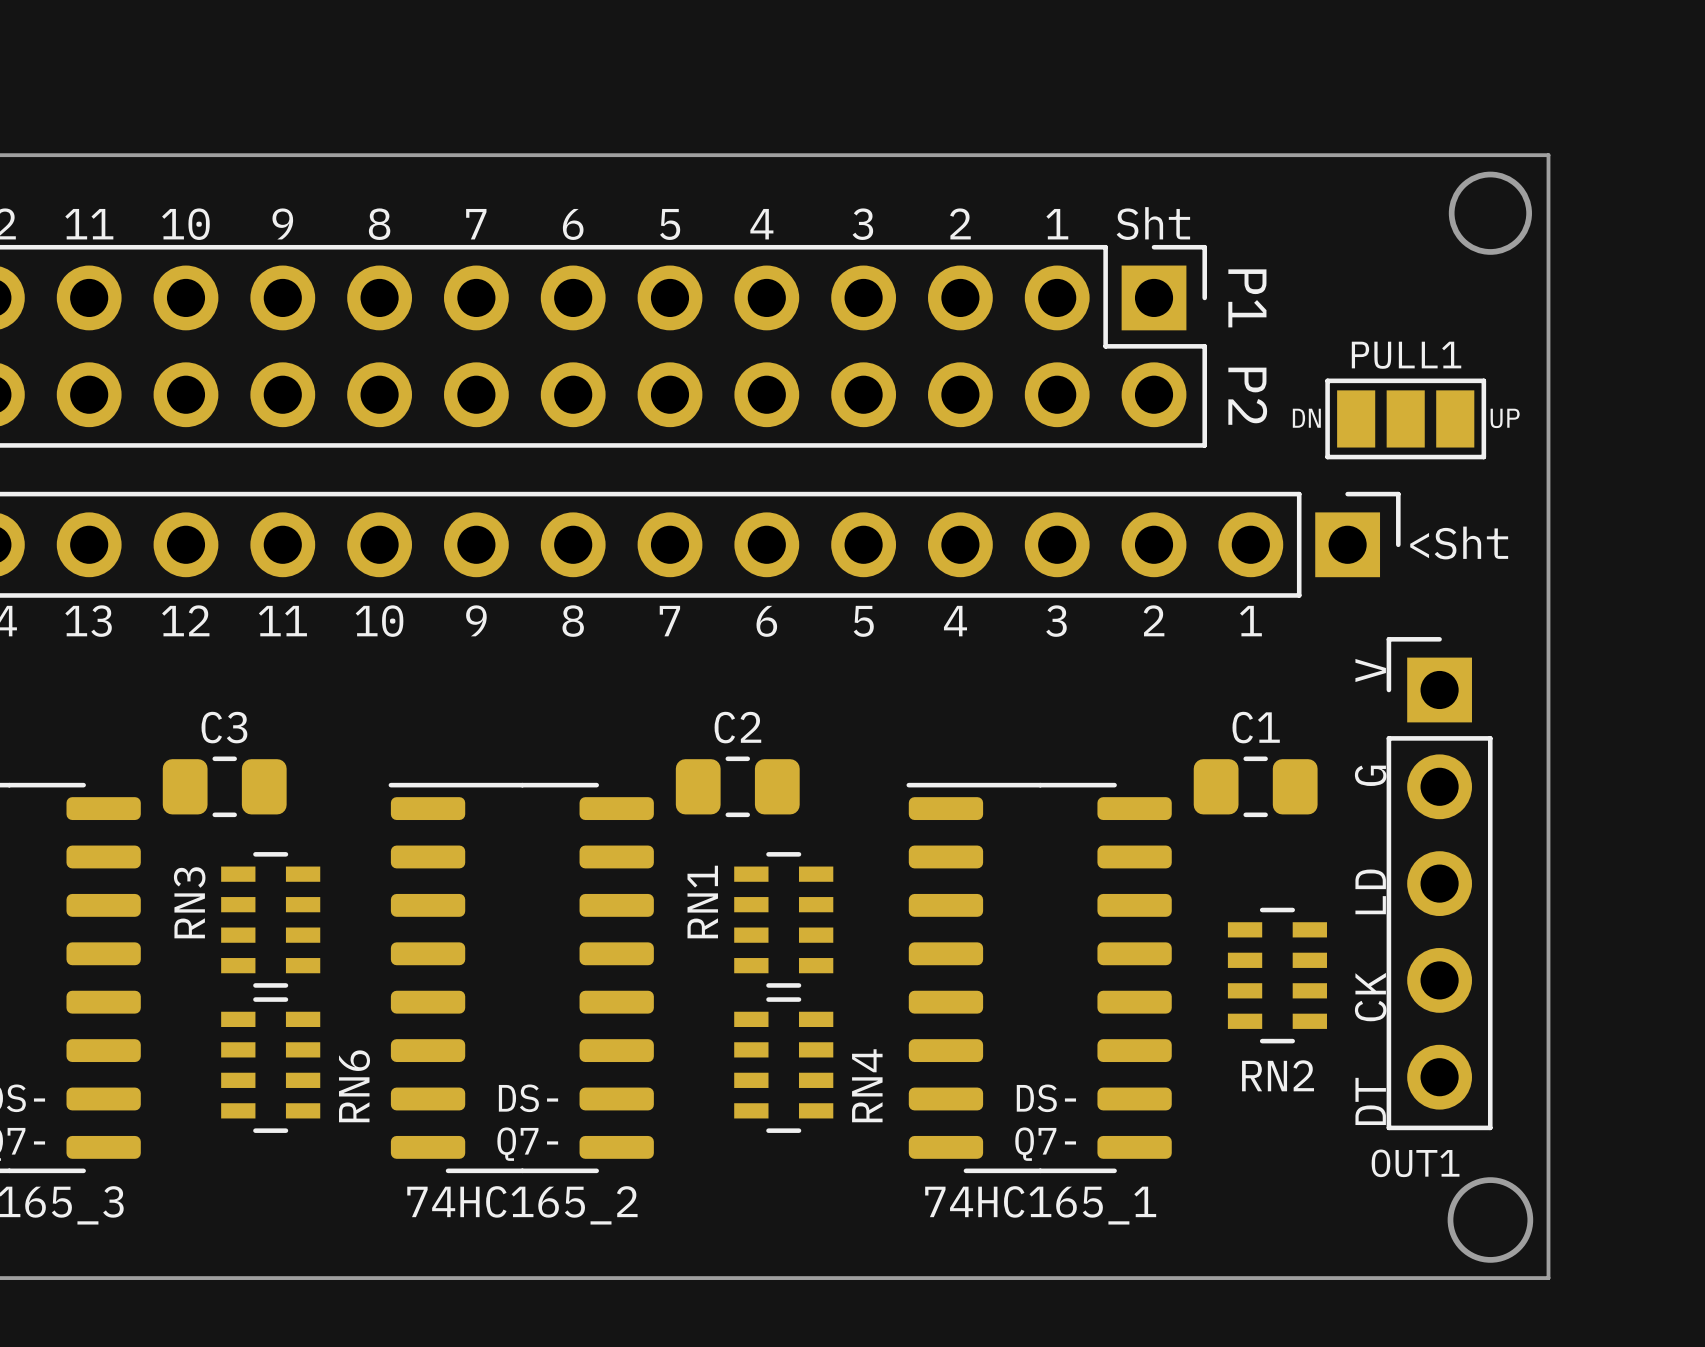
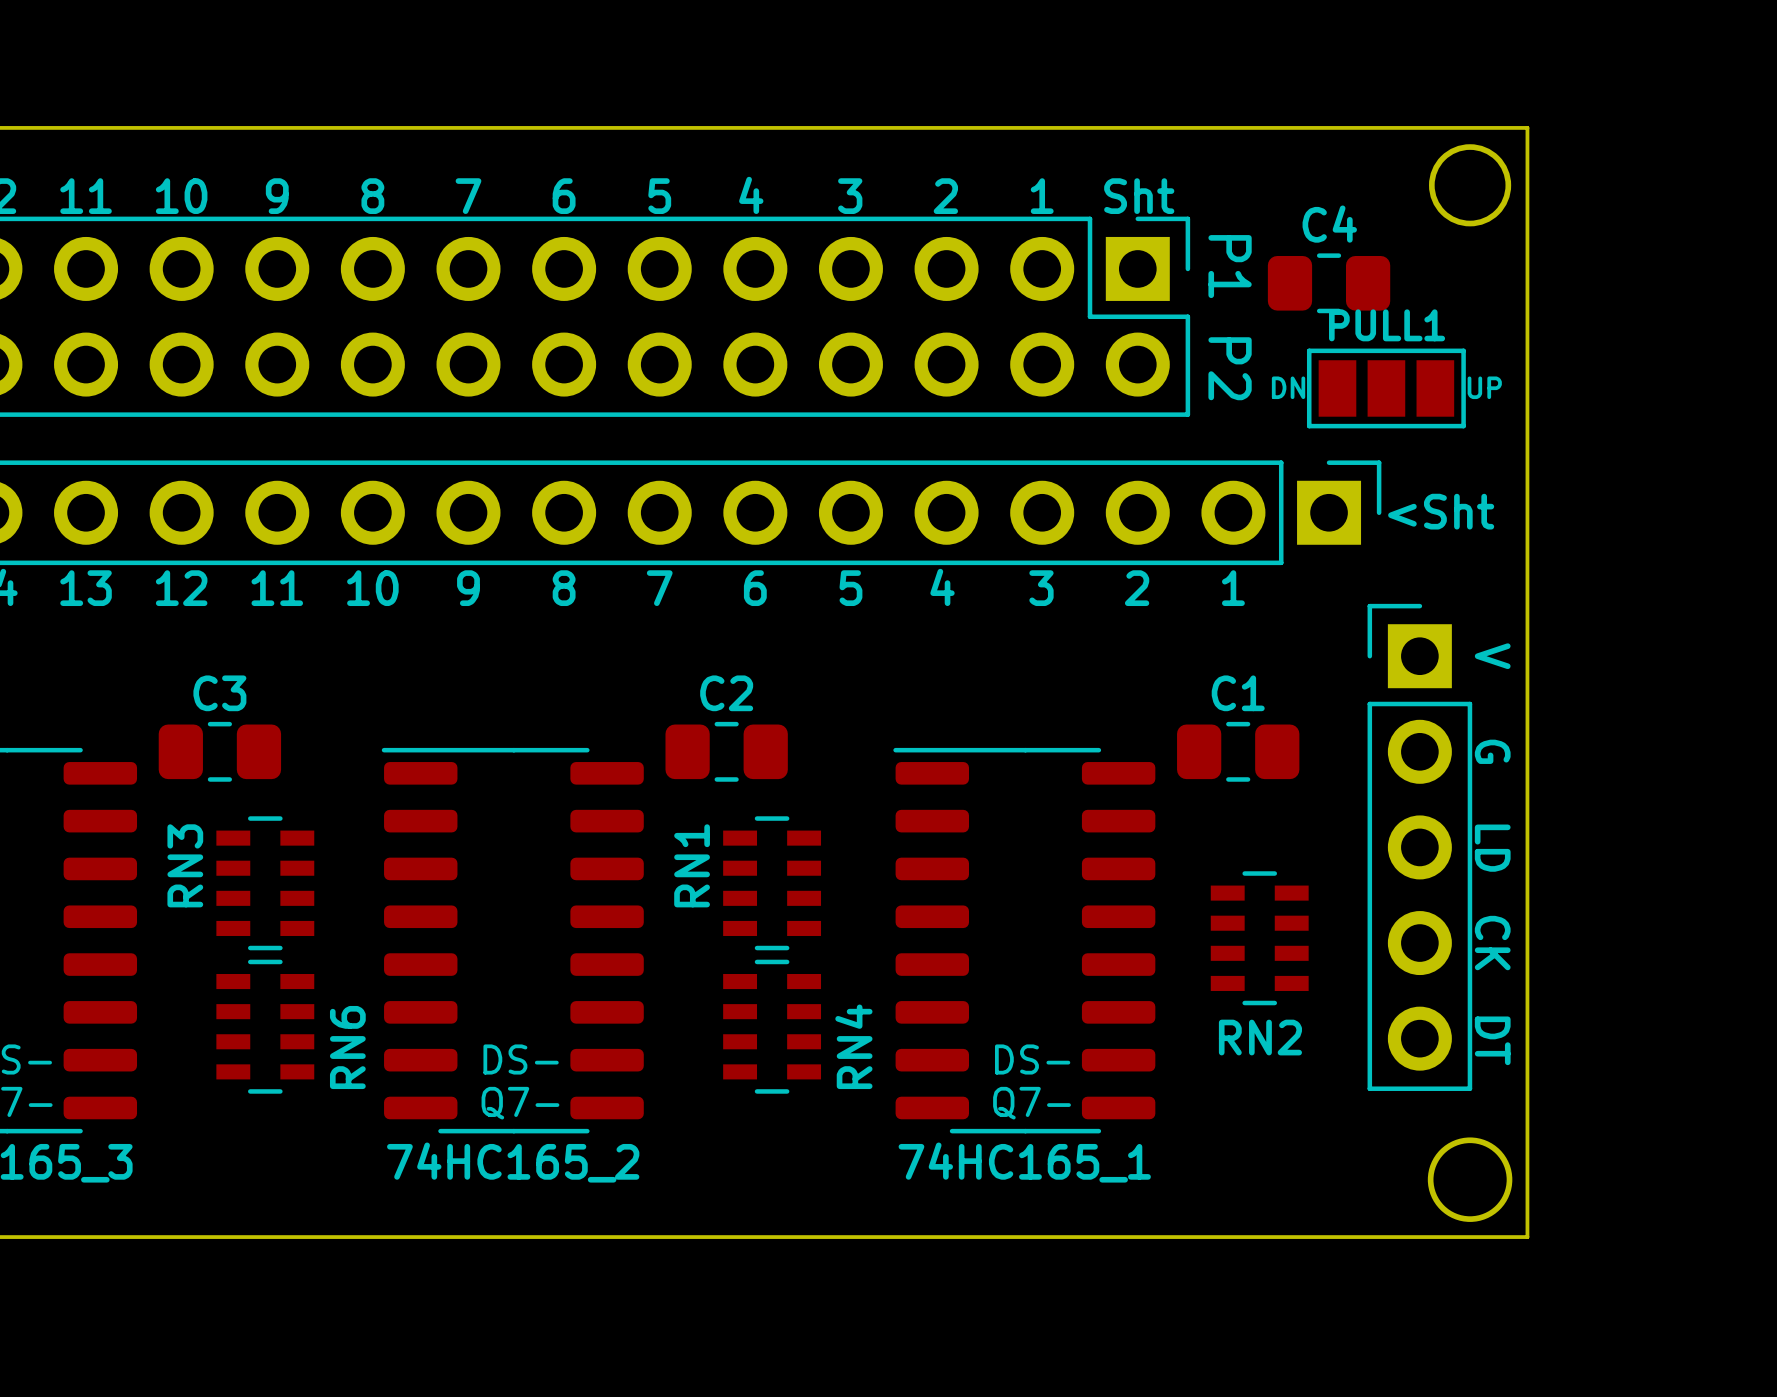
C4: none -> (1329, 283)
text: none -> V (1492, 656)
text: none -> G (1492, 751)
text: none -> LD (1492, 848)
text: DT CK LD G V (1370, 891) -> none
text: none -> CK (1492, 943)
text: none -> DT (1492, 1040)
OUT1 name: OUT1 (1415, 1163) -> none

